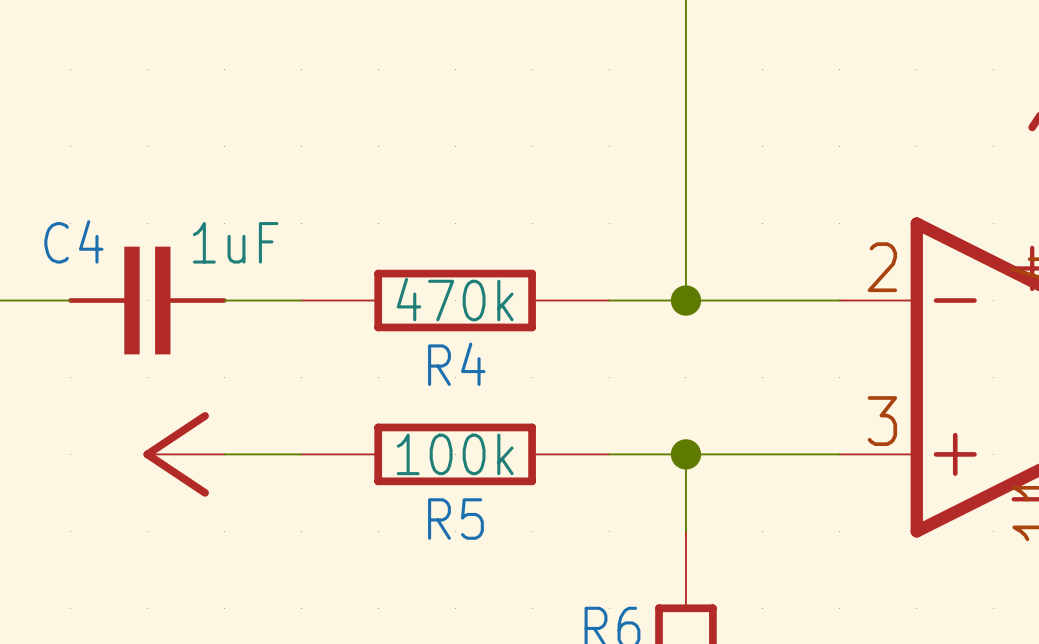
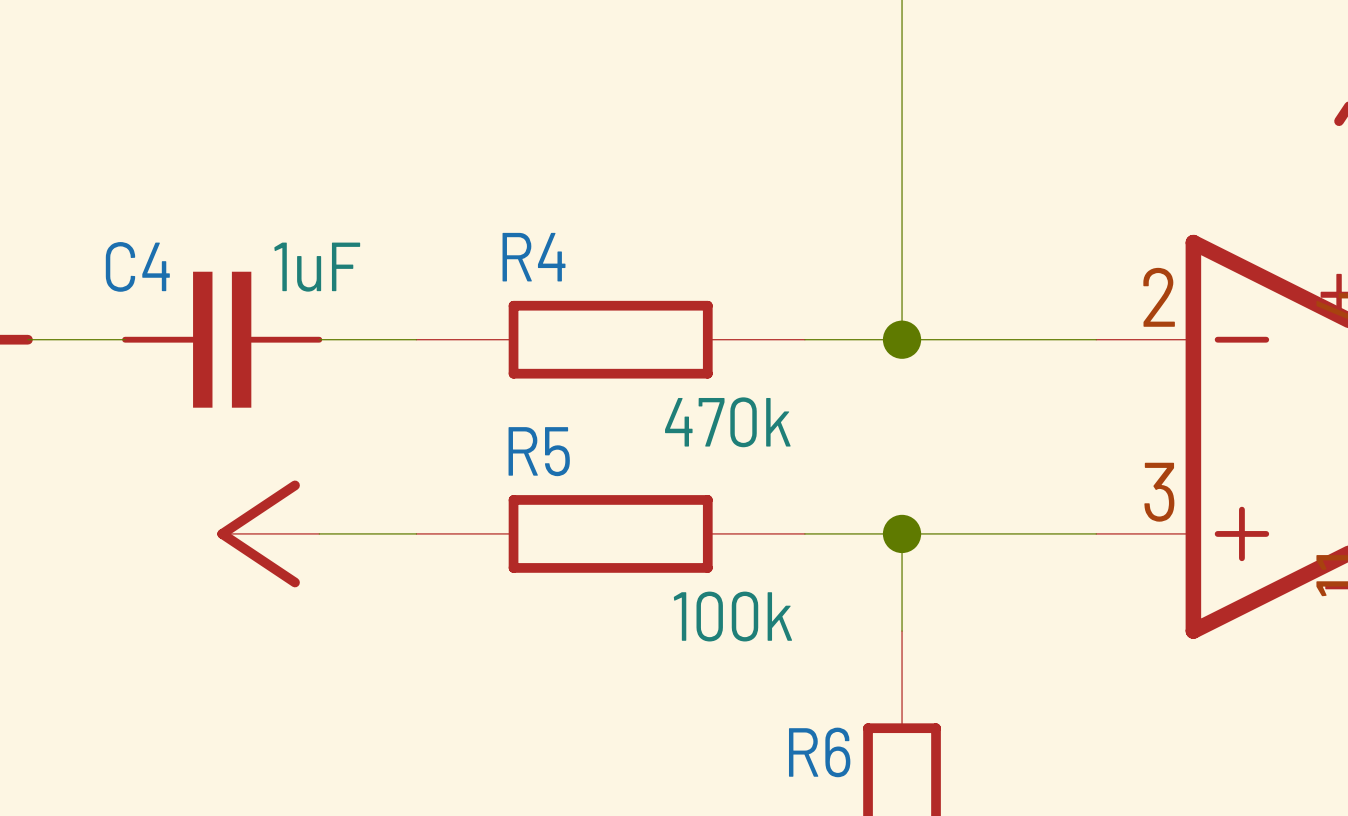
R4 value position: 470k (455, 299) -> 470k (727, 422)
R4 name position: R4 (456, 364) -> R4 (534, 257)
R5 value position: 100k (455, 454) -> 100k (732, 616)
R5 name position: R5 (455, 519) -> R5 (539, 451)

